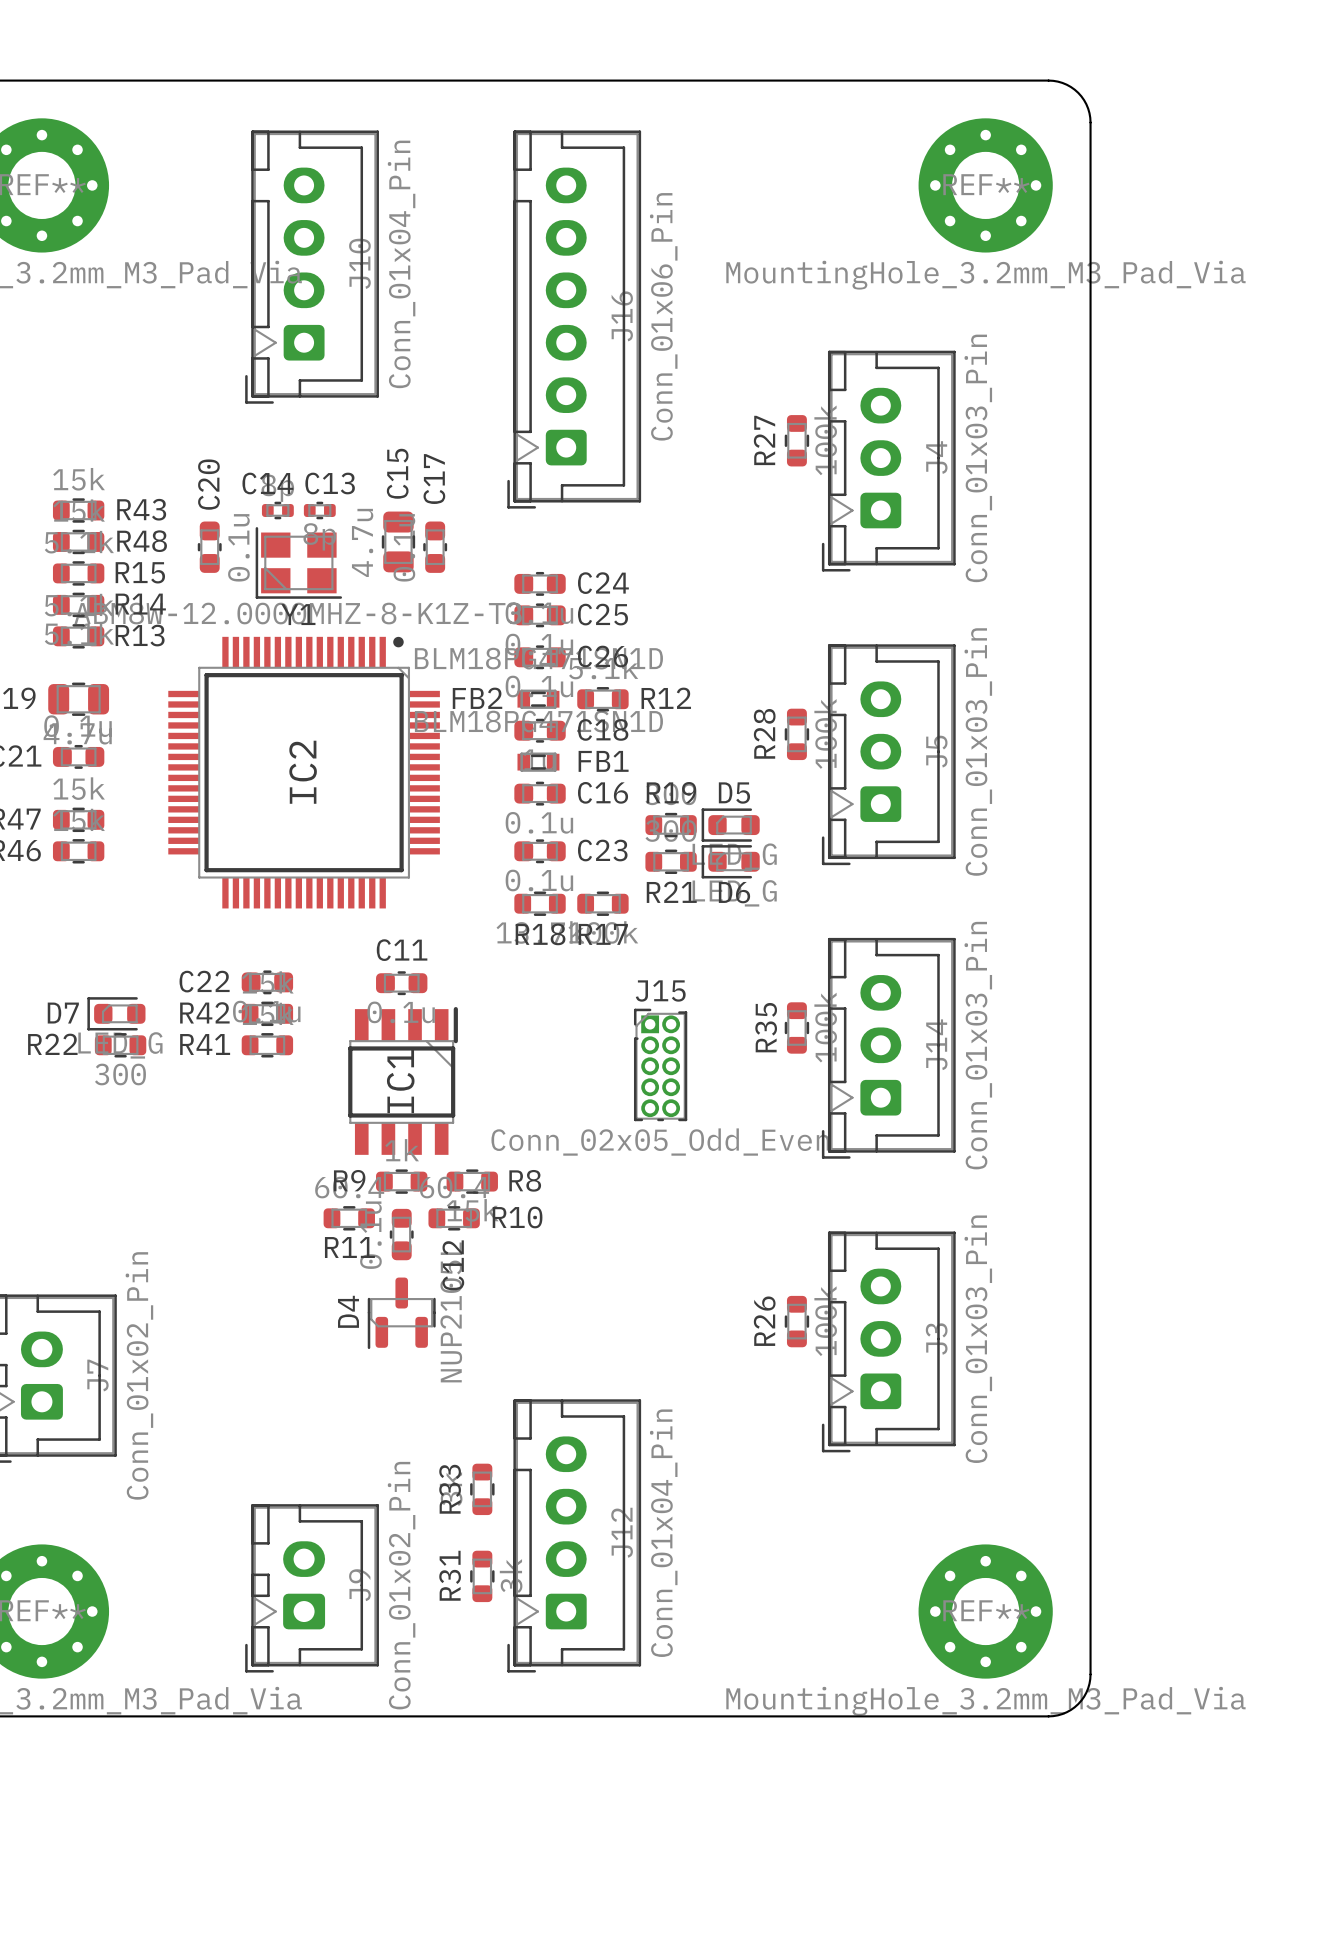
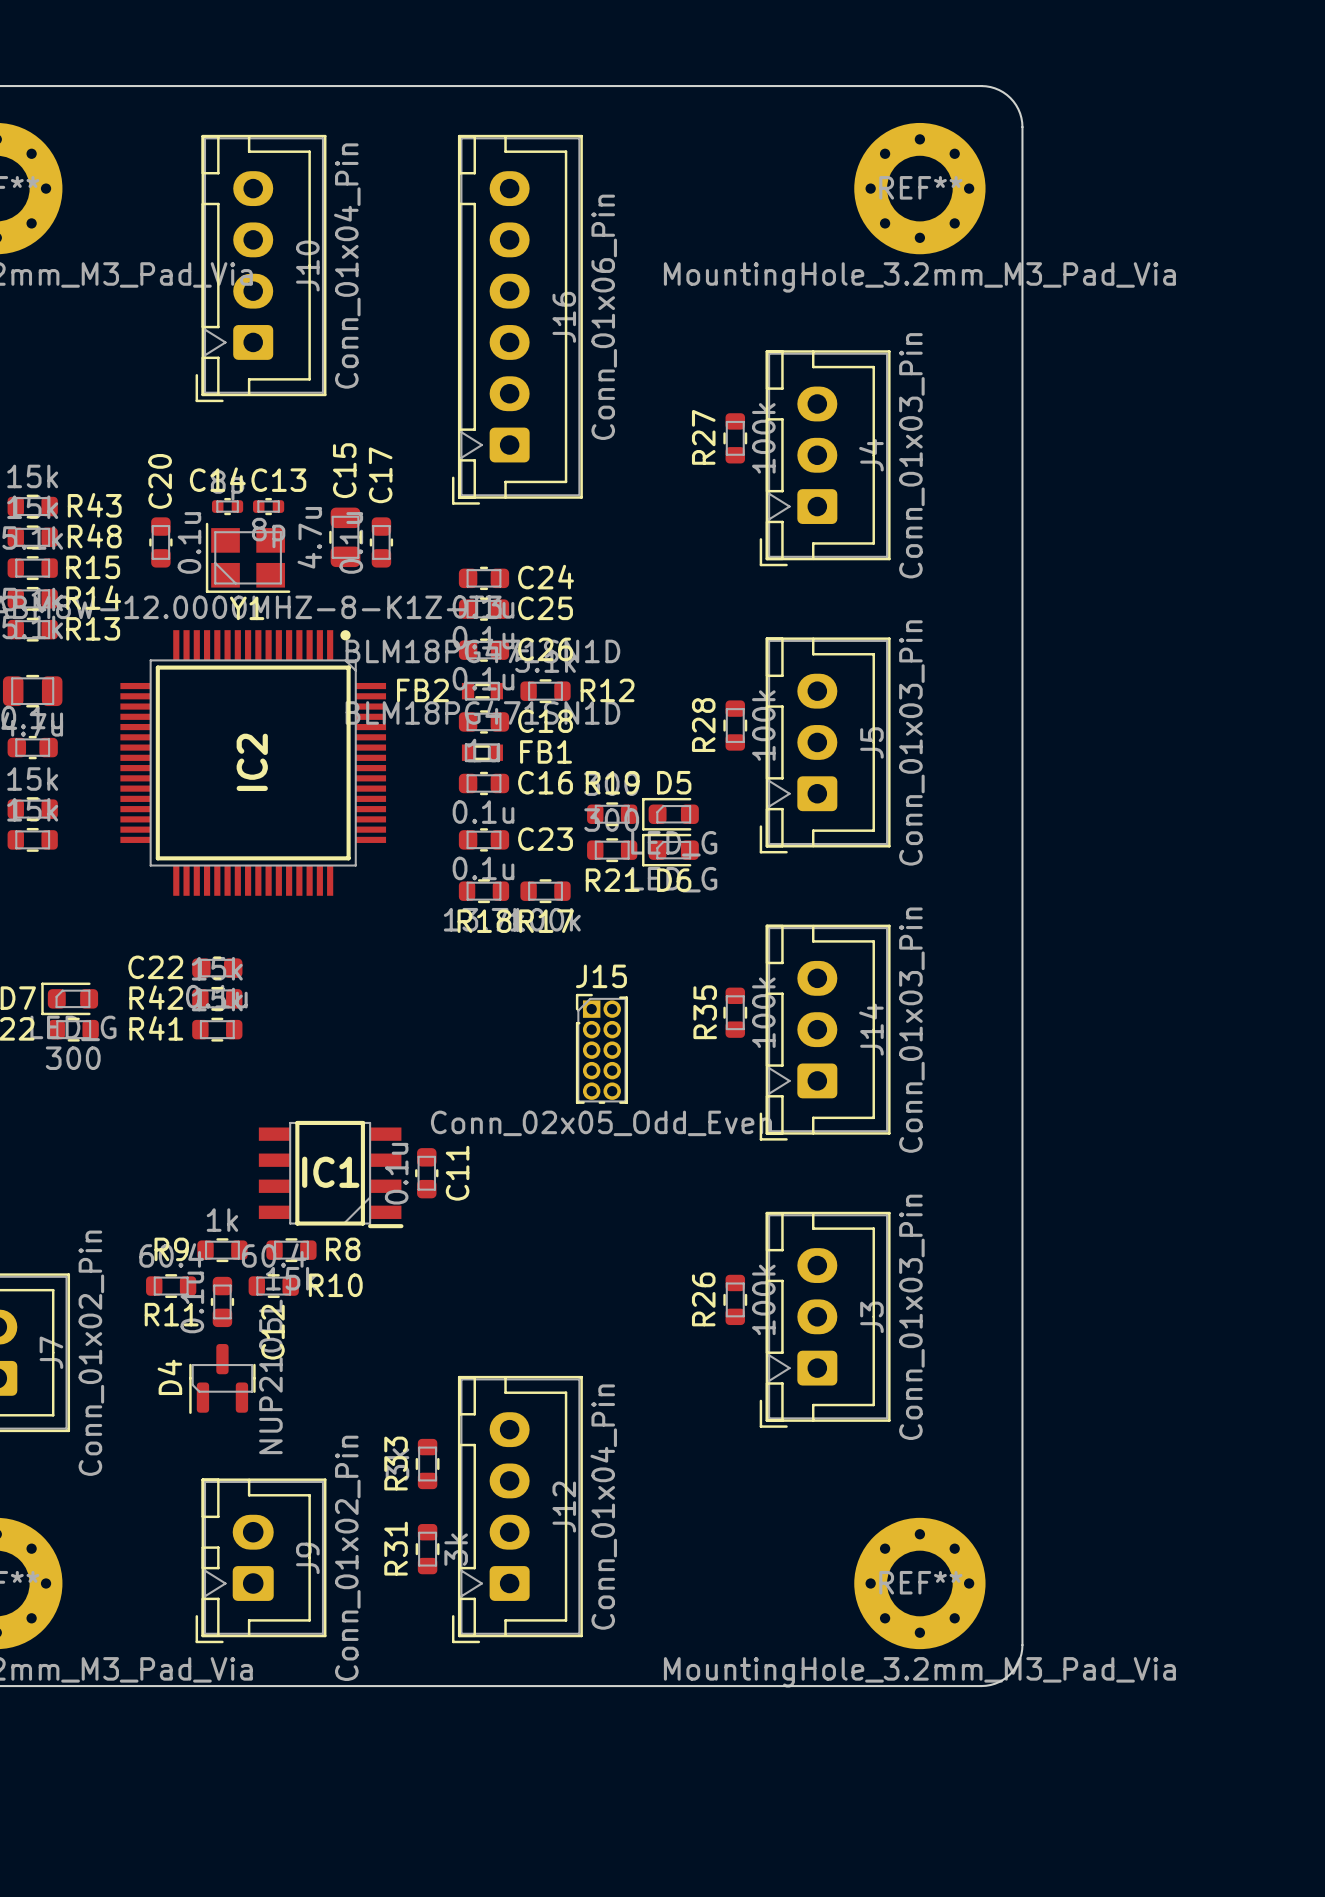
C11 rotation: 0° (401, 983) -> 90° clockwise (426, 1173)
C11 position: (401, 983) -> (426, 1173)
IC1 rotation: 0° (403, 1080) -> 90° clockwise (331, 1174)
IC1 position: (403, 1080) -> (331, 1174)
R9 position: (401, 1181) -> (222, 1250)
R8 position: (472, 1181) -> (291, 1250)
R11 position: (349, 1218) -> (171, 1286)
R10 position: (454, 1218) -> (273, 1286)
C12 position: (401, 1234) -> (222, 1301)
D4 position: (401, 1313) -> (222, 1378)

